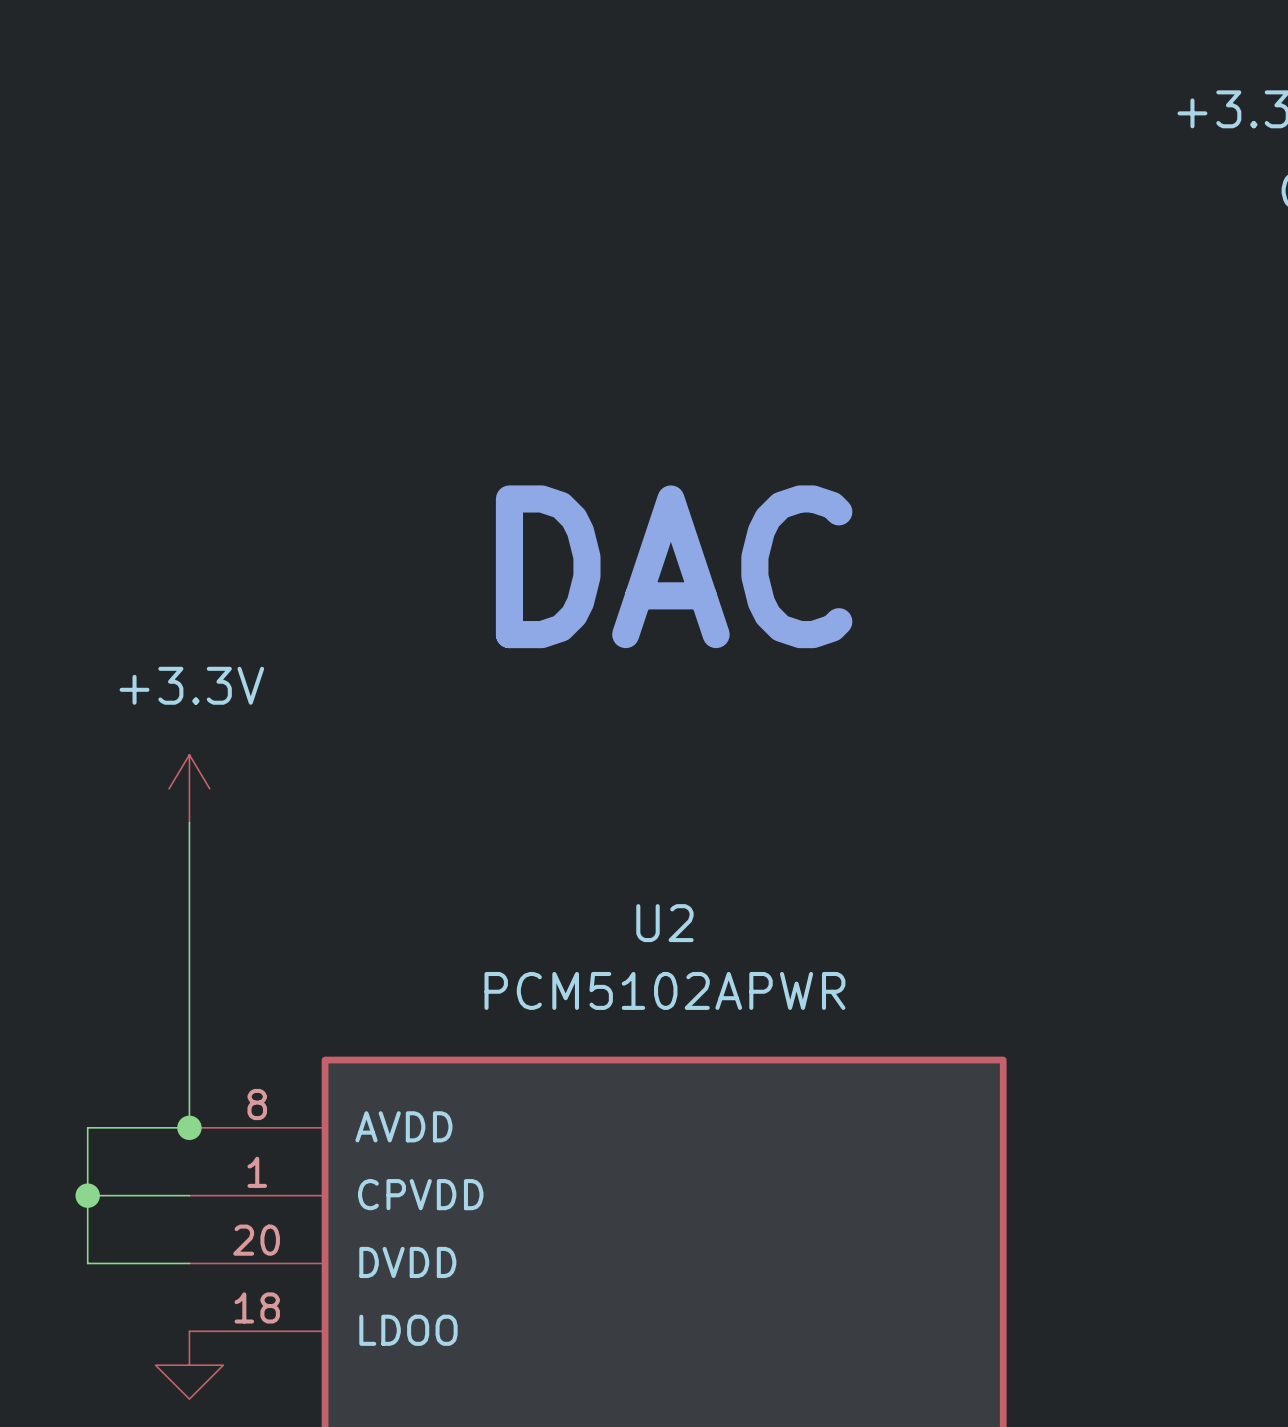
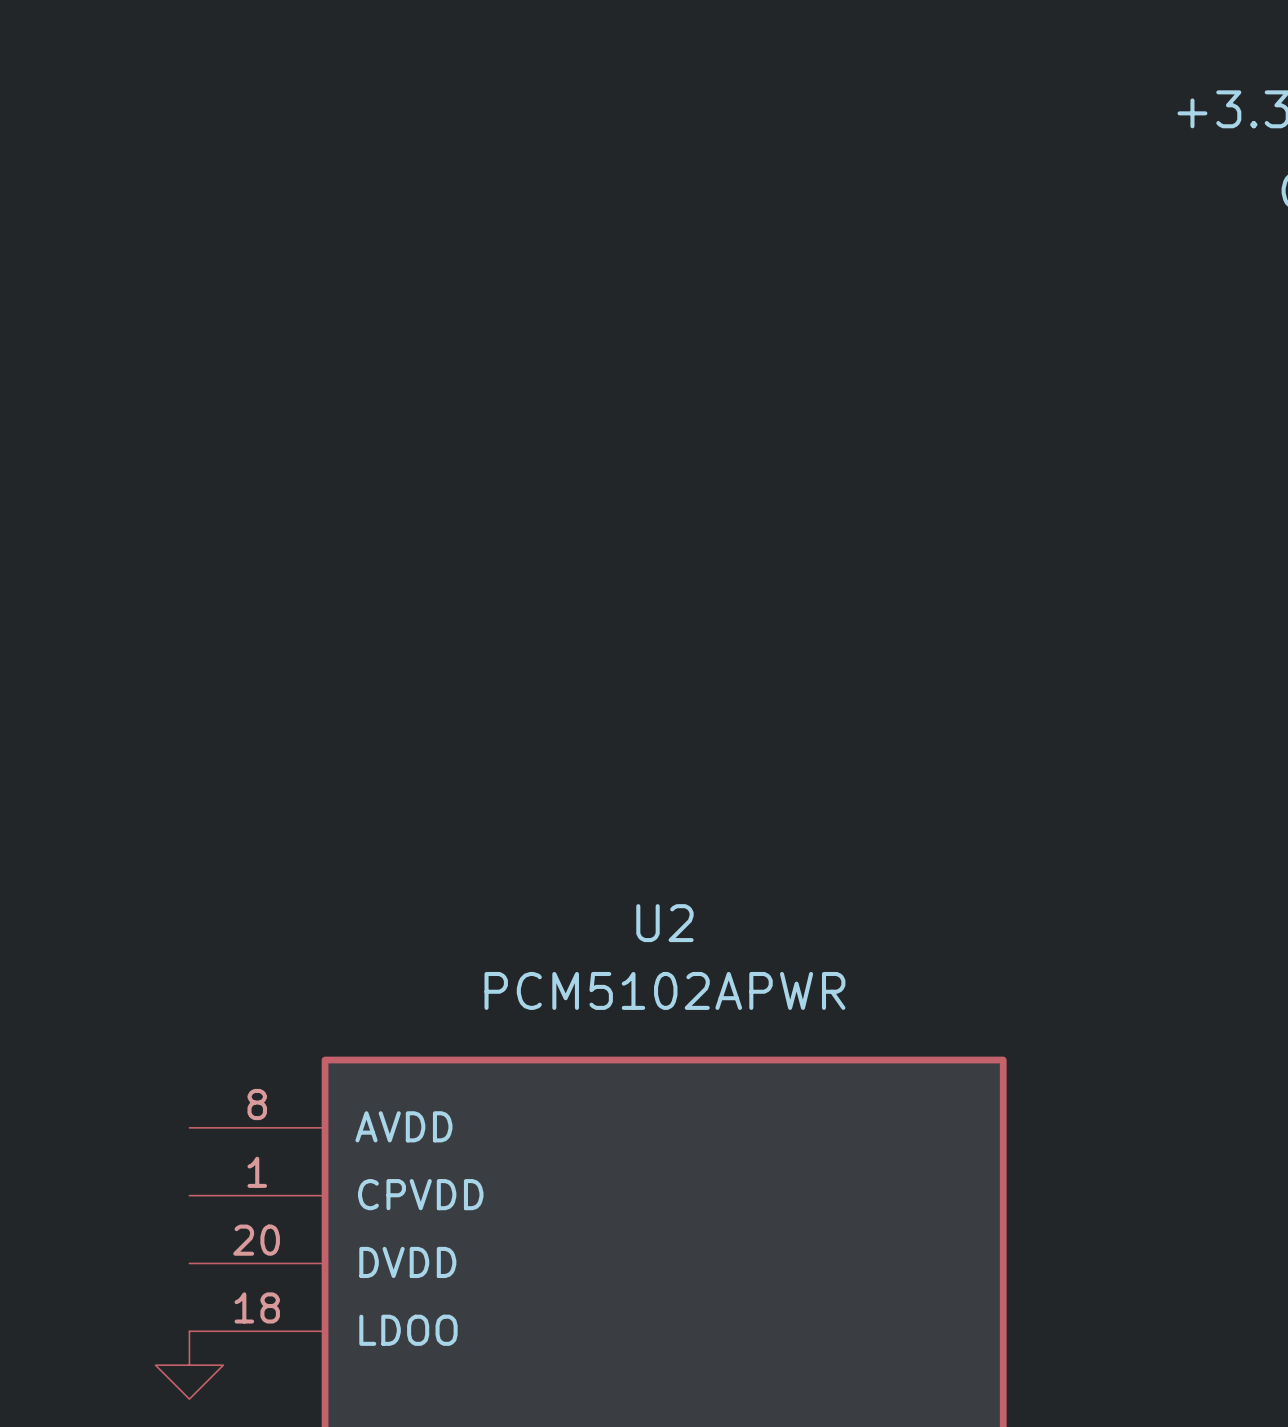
text: DAC (674, 566) -> none
power symbol: +3.3V (189, 788) -> none
wire: (189, 822) (189, 1127) (87, 1127) (87, 1263) (189, 1263) -> none
junction: (189, 1127) -> none
wire: (87, 1195) (189, 1195) -> none
junction: (87, 1195) -> none

